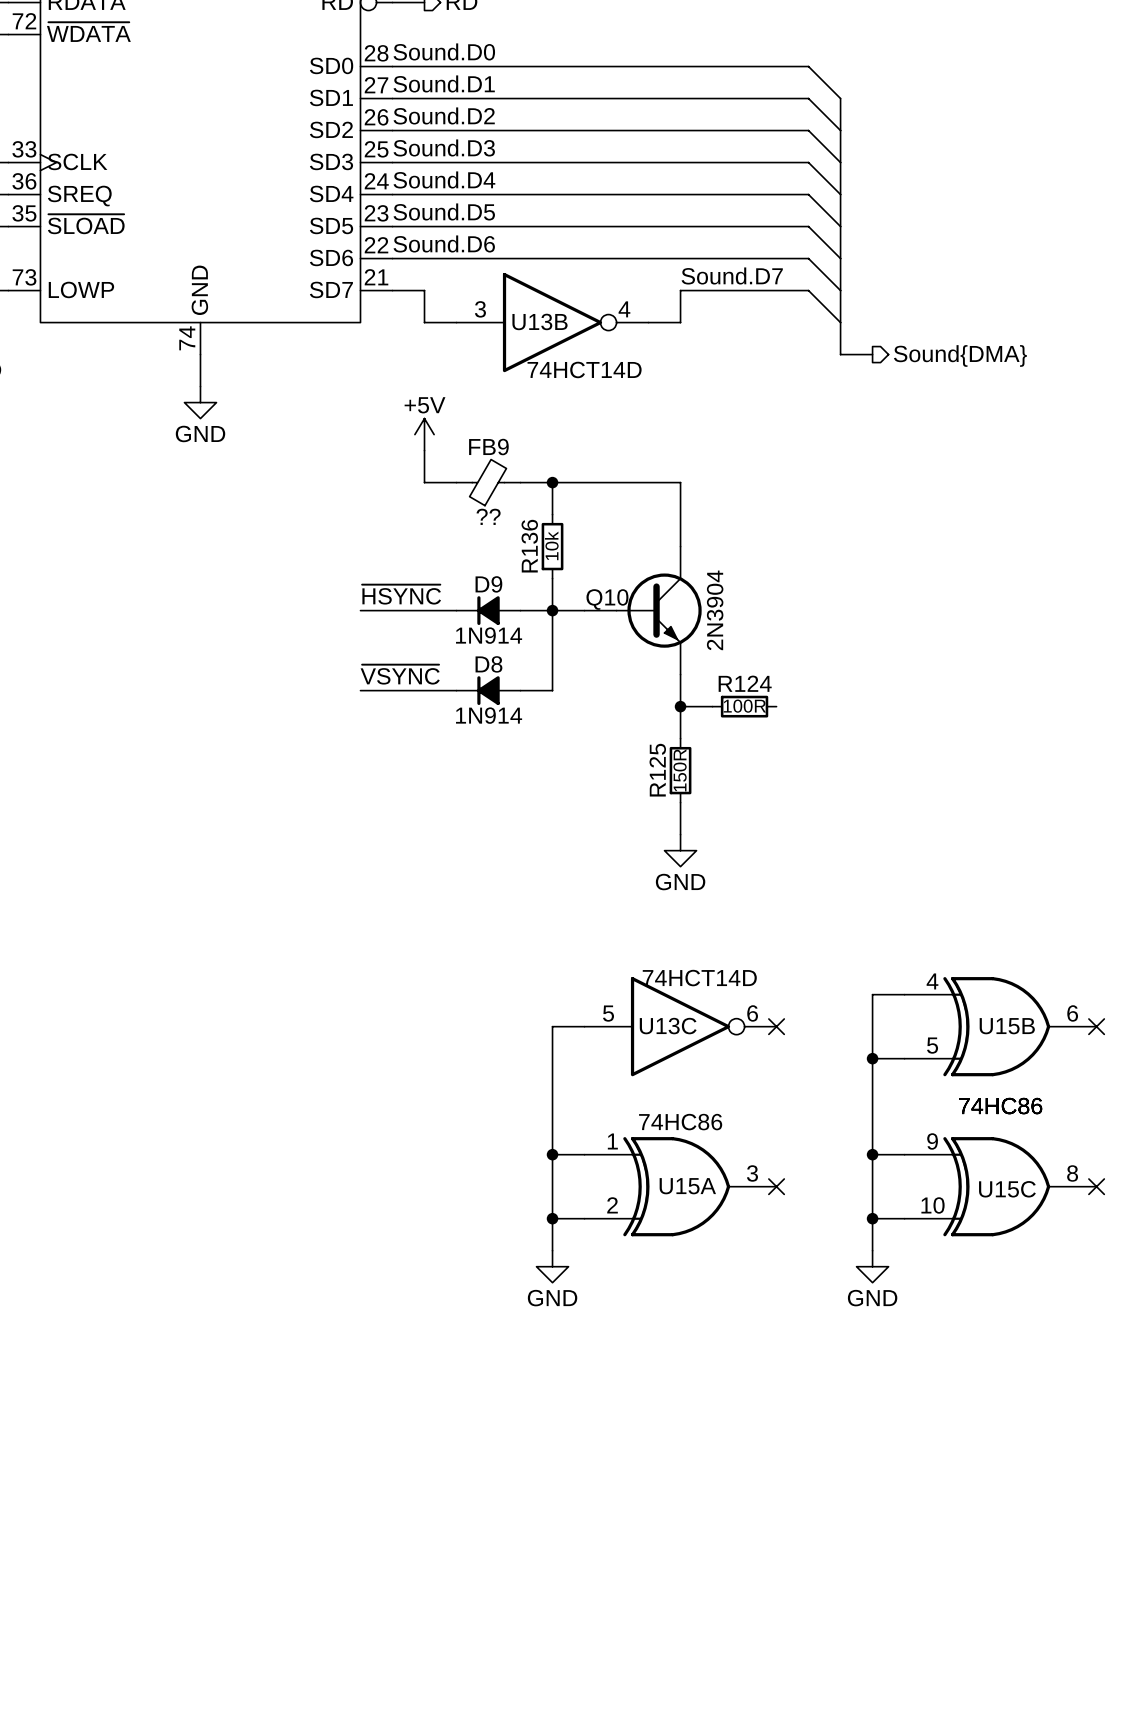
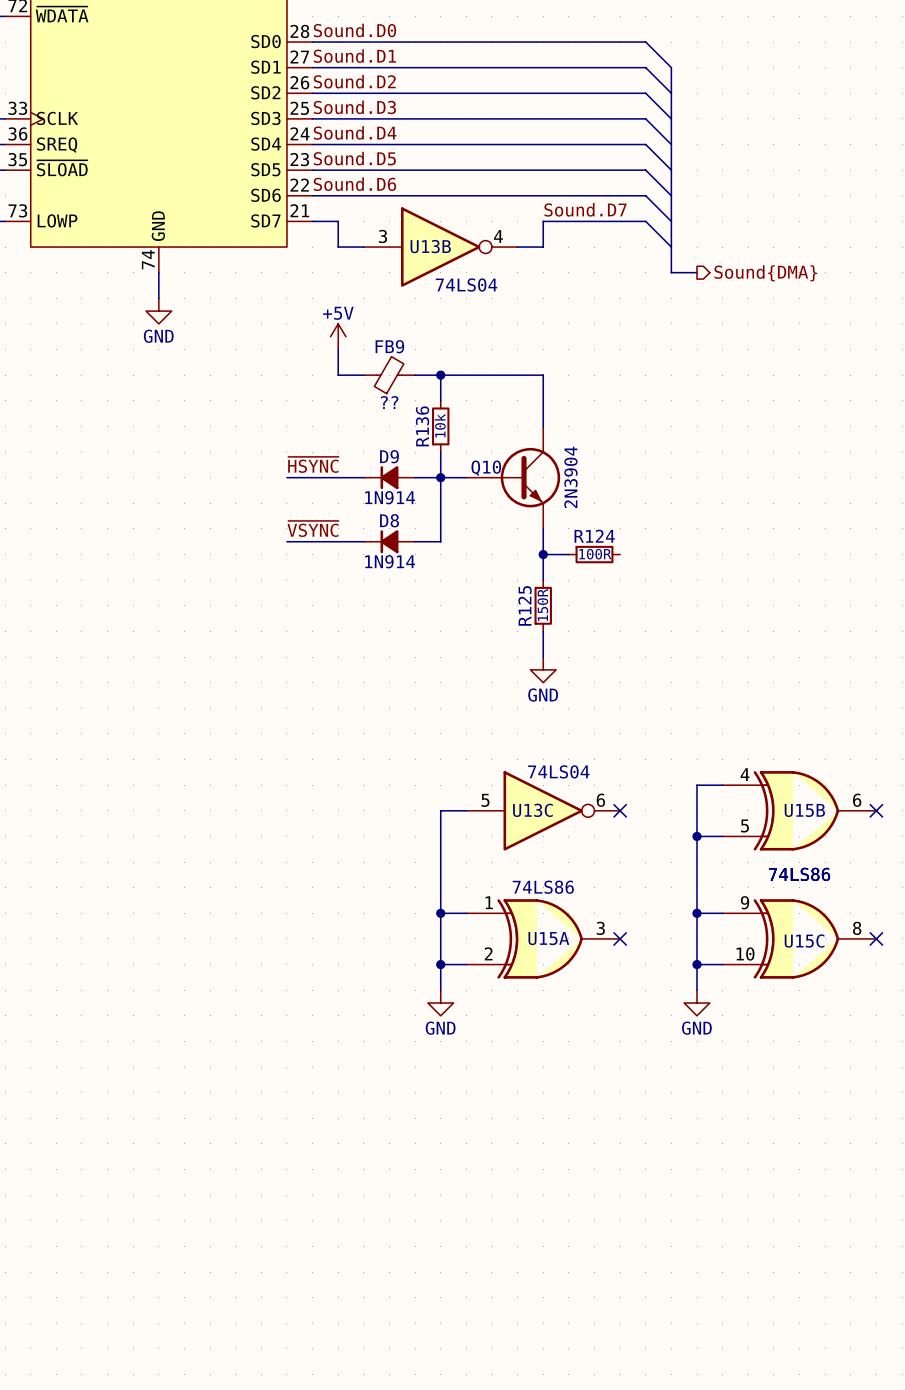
U13B value: 74HCT14D (584, 369) -> 74LS04 (466, 285)
U13C value: 74HCT14D (699, 978) -> 74LS04 (558, 771)
U15C value: 74HC86 (1000, 1106) -> 74LS86 (799, 874)
U15B value: 74HC86 (1000, 1106) -> 74LS86 (799, 874)
U15A value: 74HC86 (680, 1122) -> 74LS86 (543, 887)

